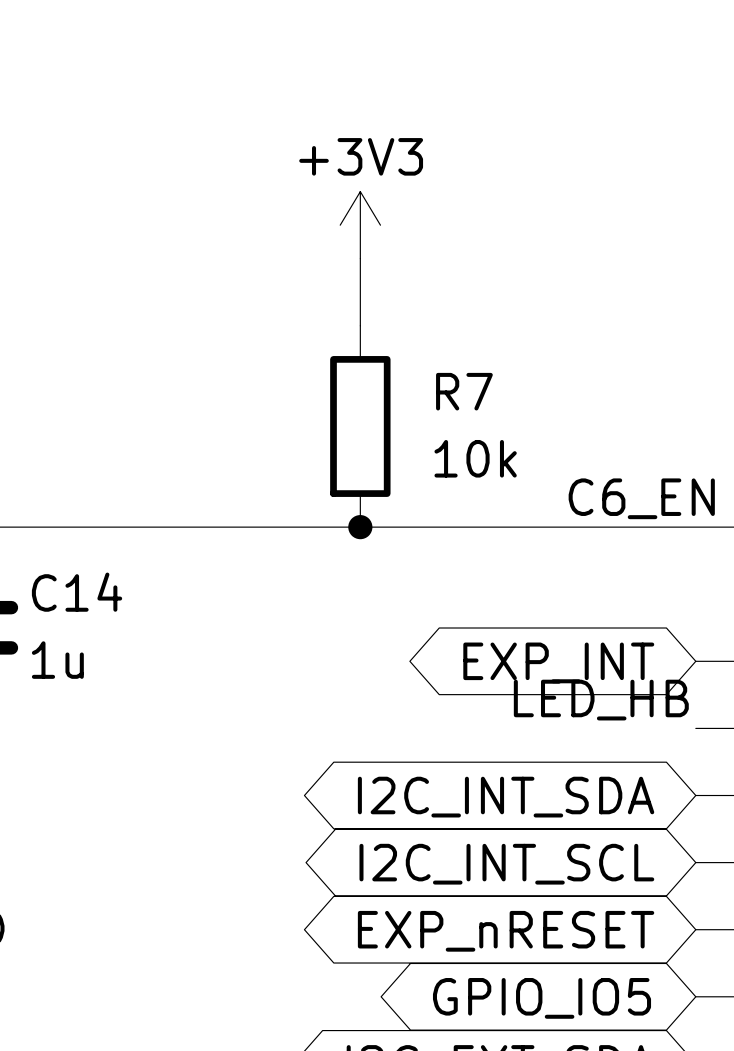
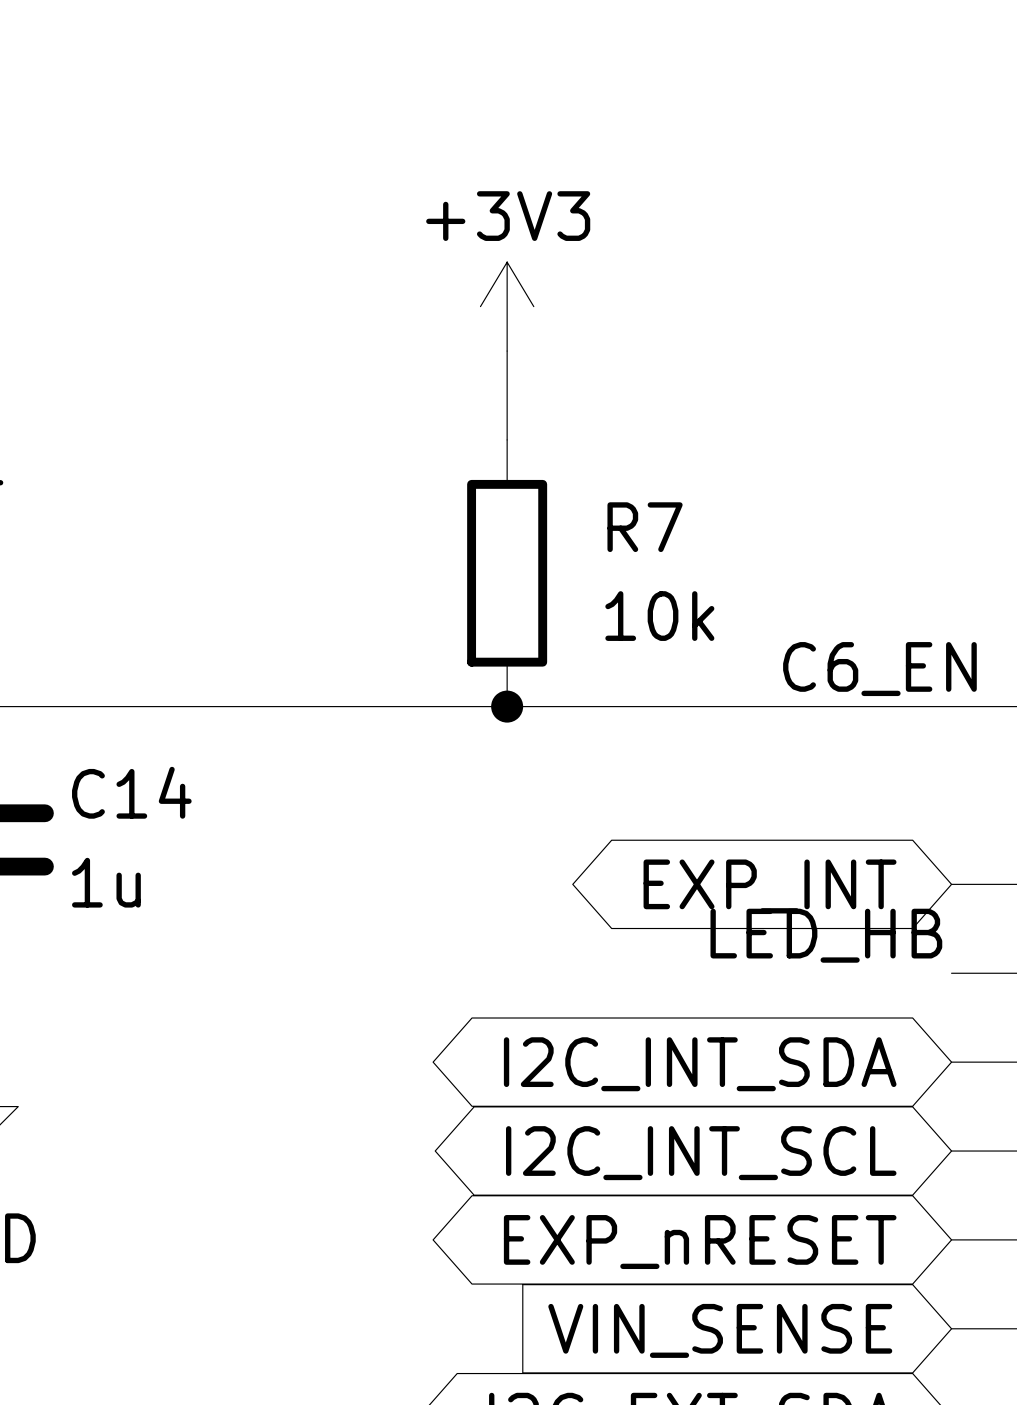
global label shape: bidirectional (542, 998) -> input (720, 1330)
global label: GPIO_IO5 (542, 998) -> VIN_SENSE (720, 1330)

